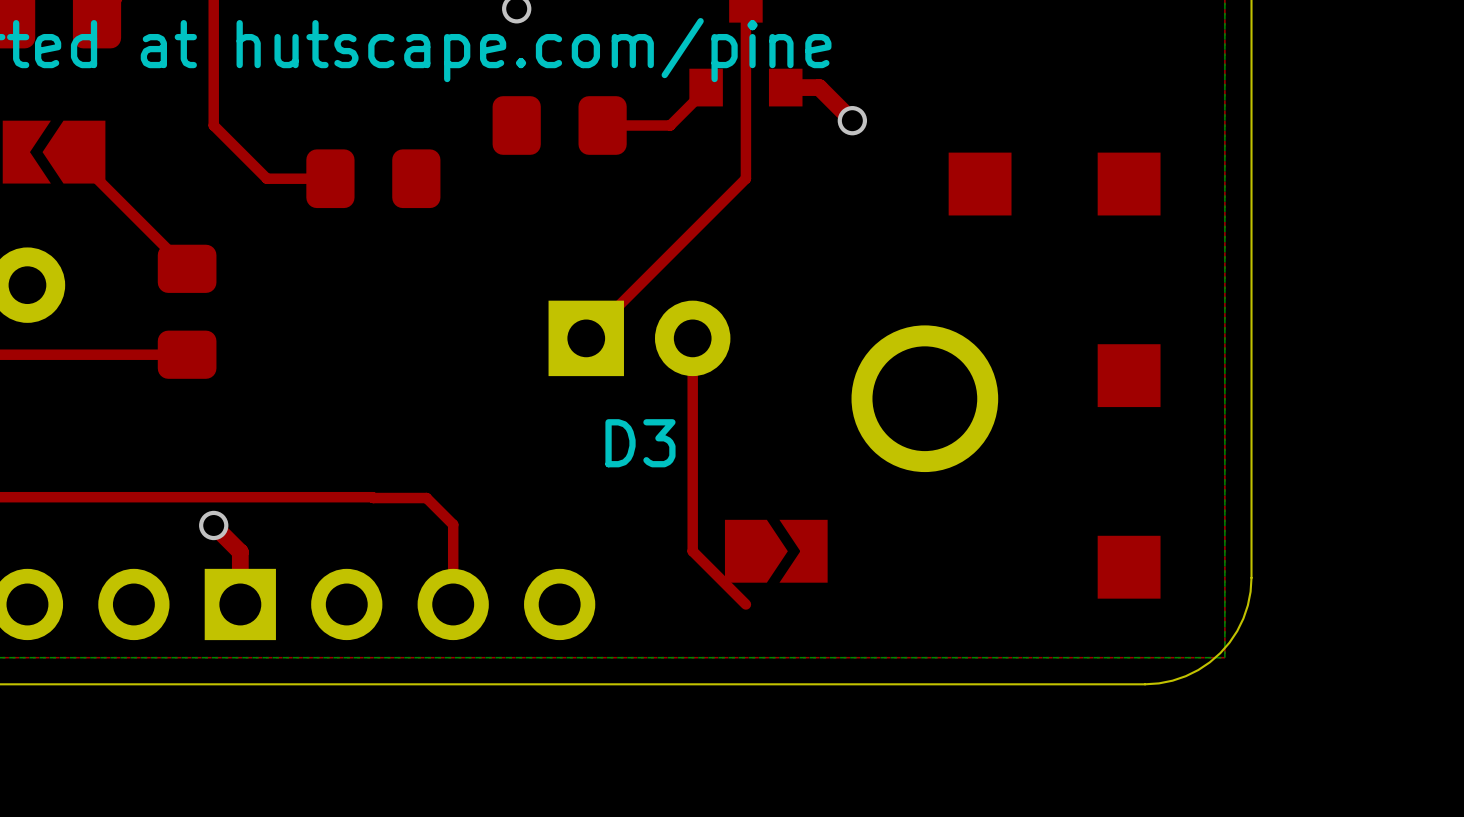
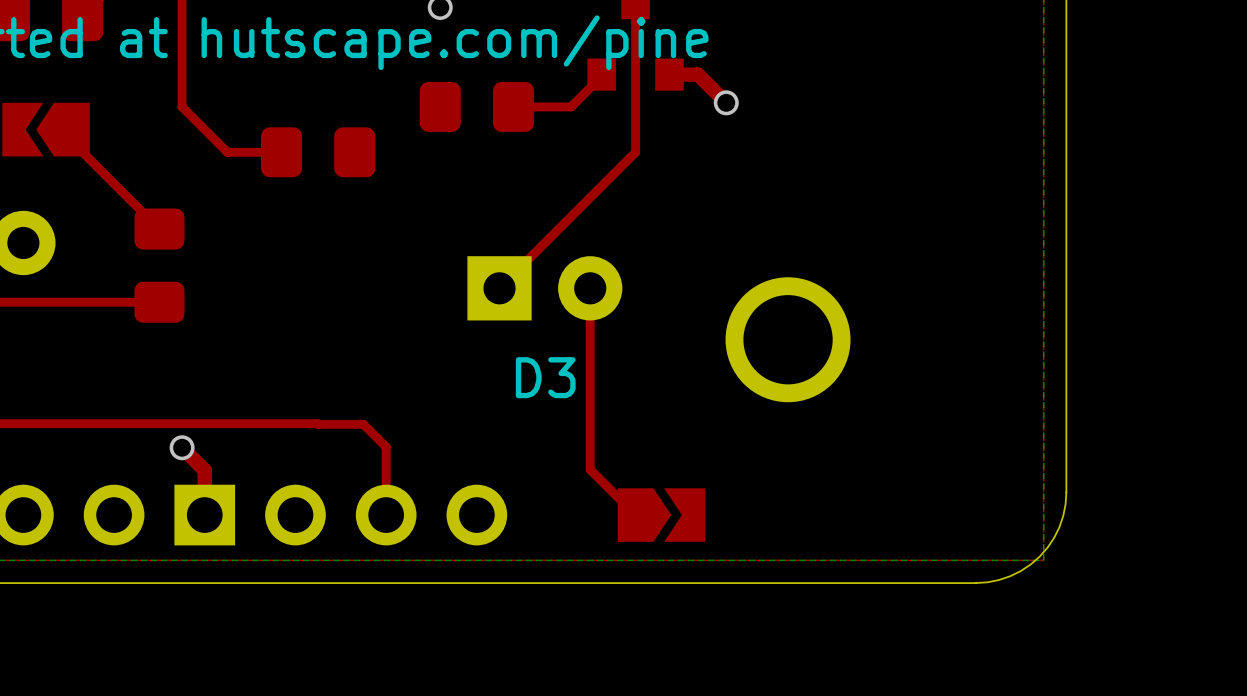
part: (980, 184) -> none
part: (1129, 184) -> none
part: (1129, 375) -> none
part position: (776, 551) -> (661, 515)
part: (1129, 567) -> none

